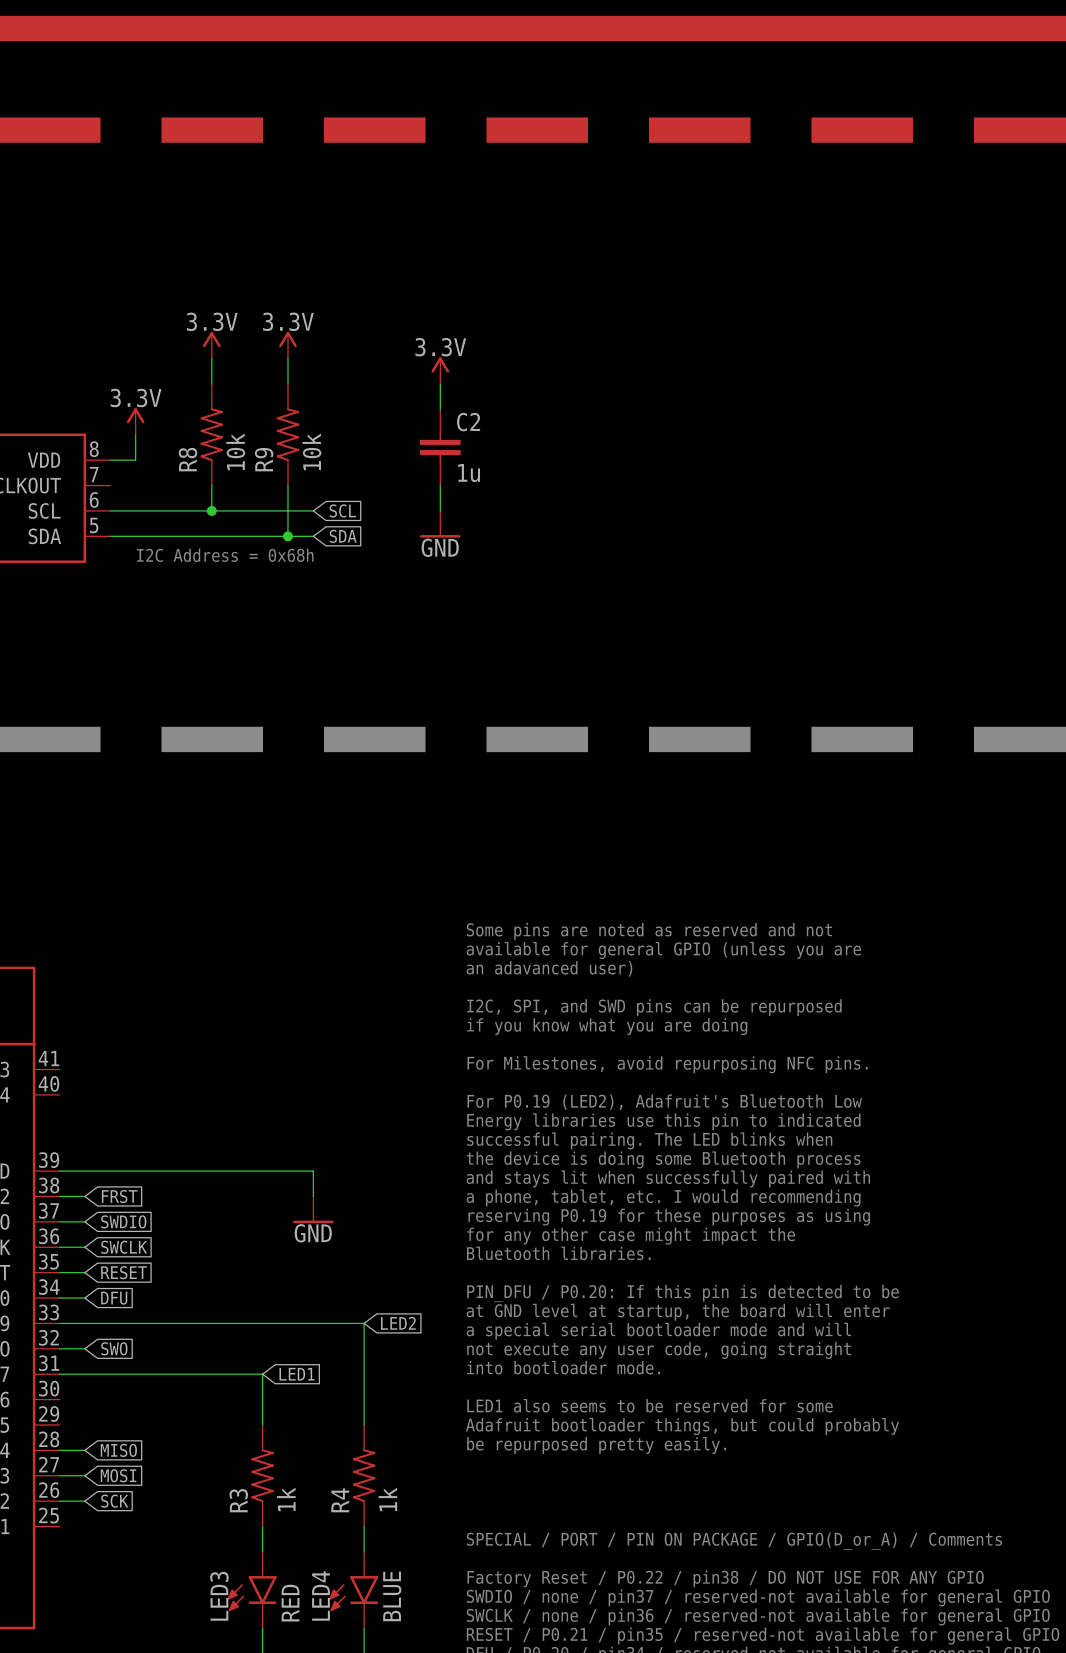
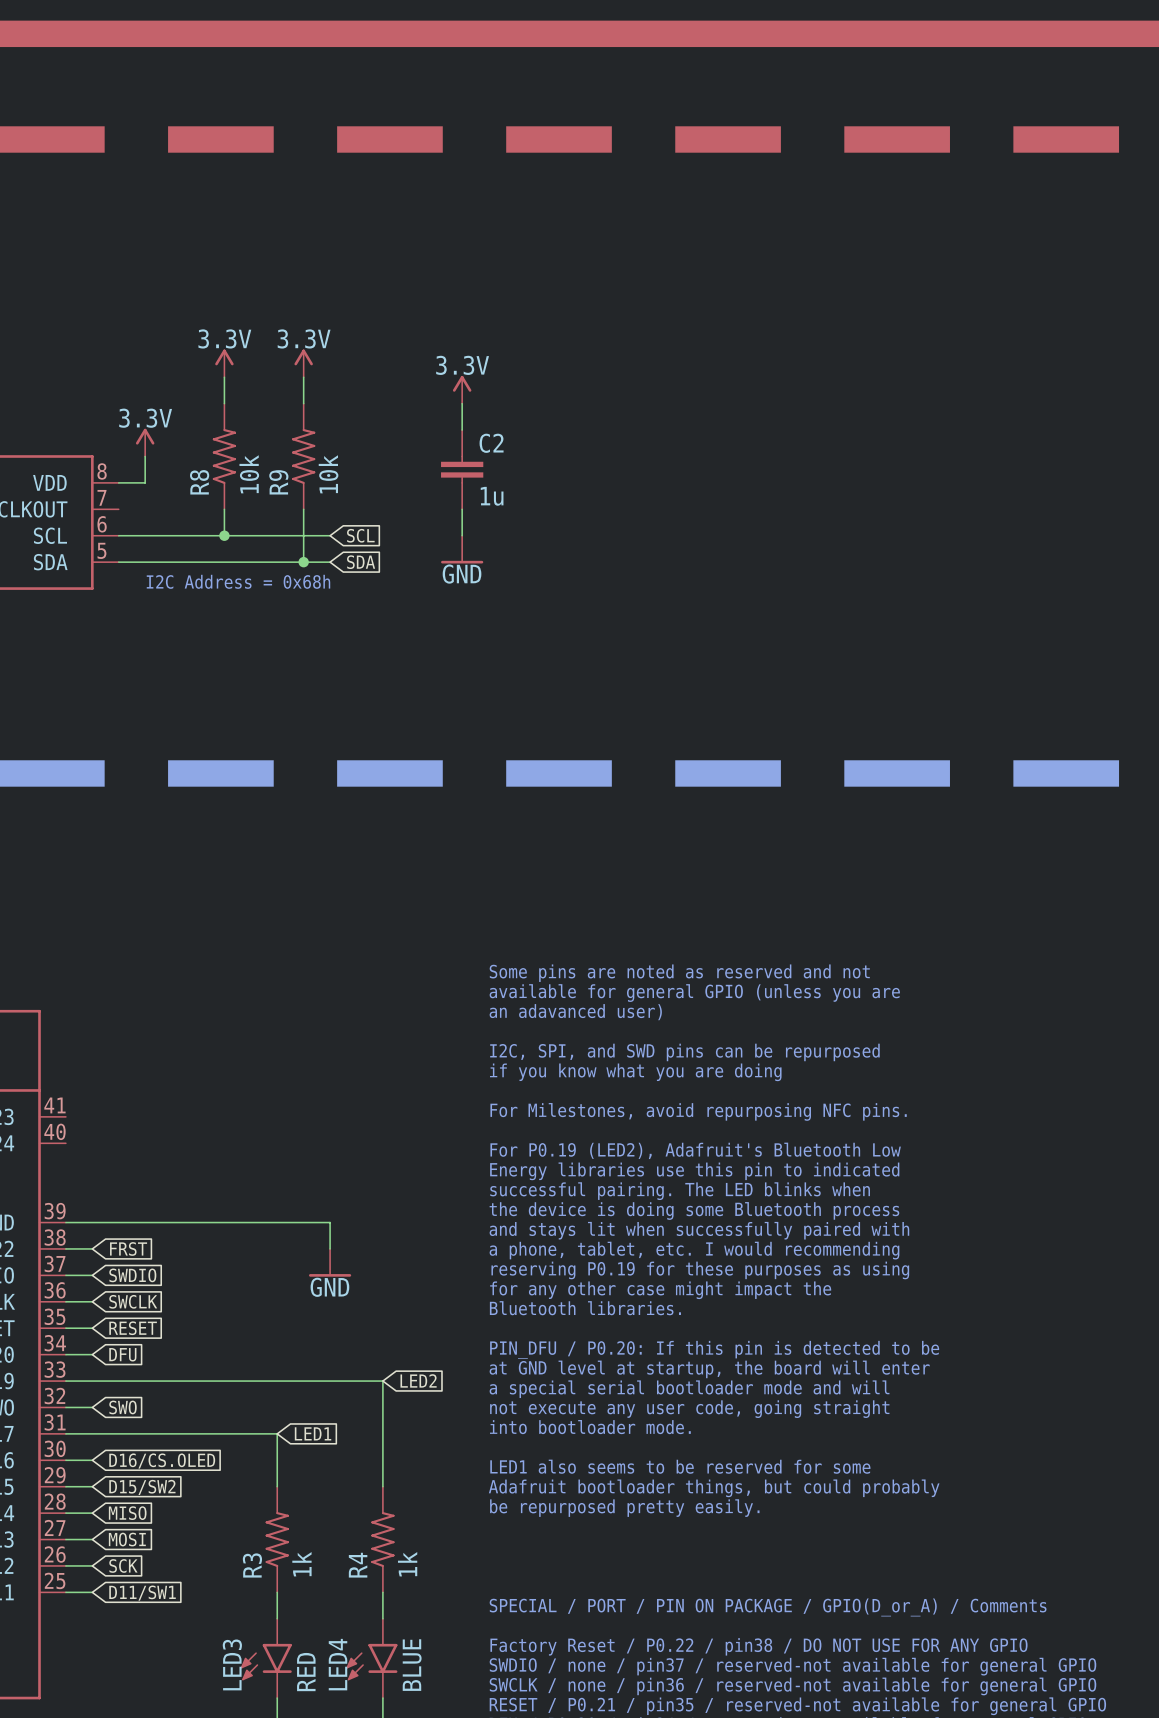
wire: none -> (65, 1460) (92, 1460)
global label: none -> D16/CS.OLED (162, 1461)
wire: none -> (65, 1486) (92, 1486)
global label: none -> D15/SW2 (142, 1487)
wire: none -> (65, 1592) (92, 1592)
global label: none -> D11/SW1 (142, 1593)

